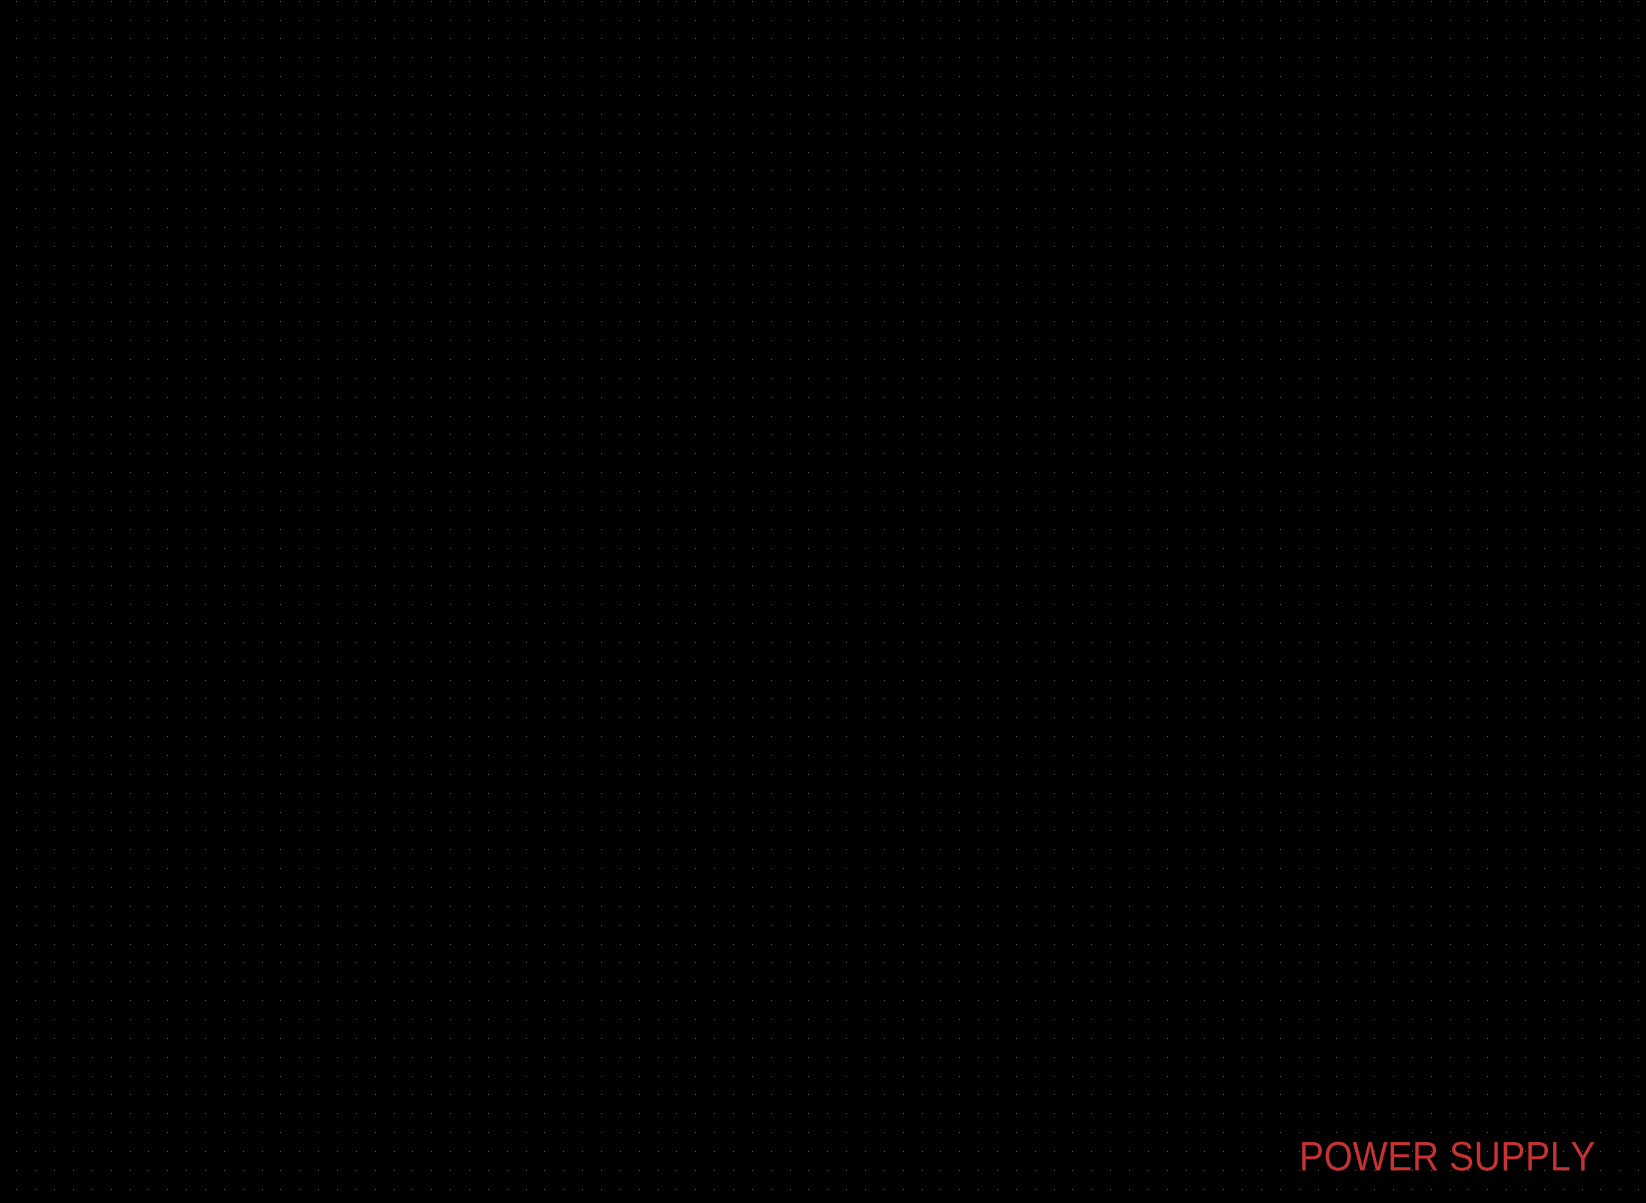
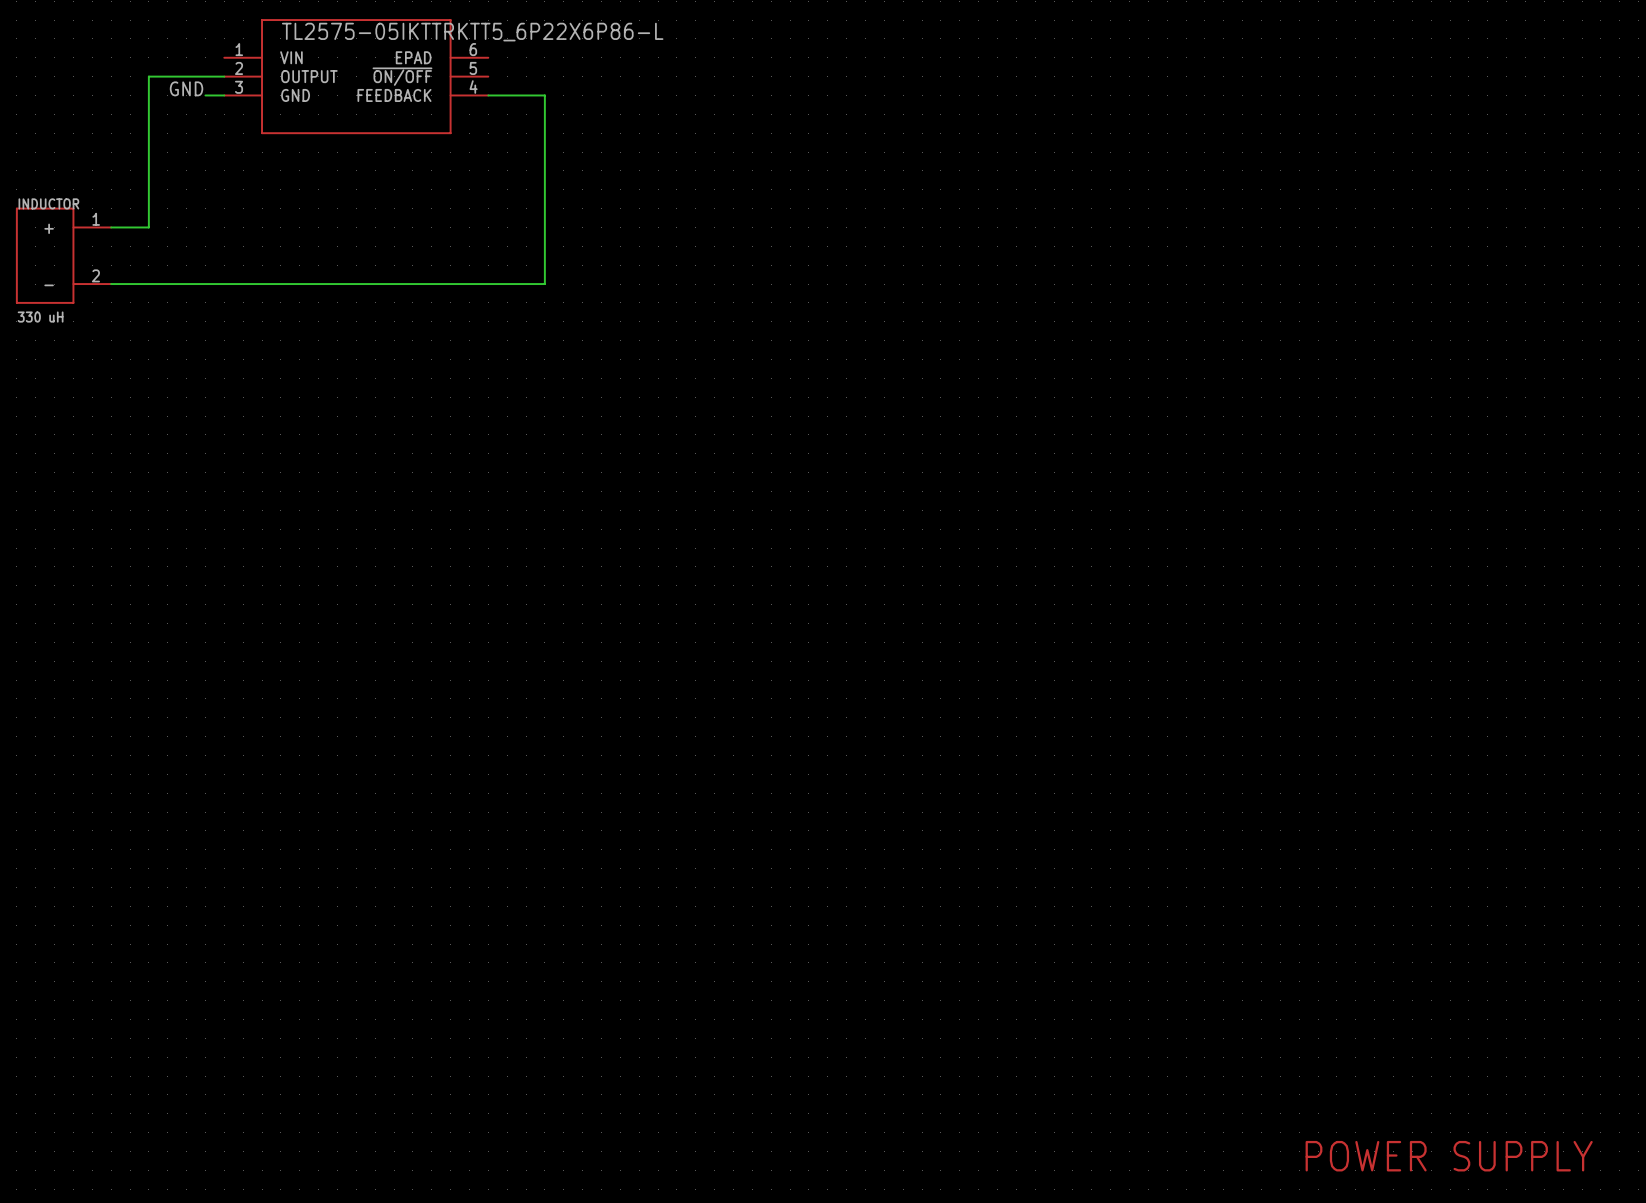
wire: none -> (224, 76) (148, 76) (148, 227) (111, 227)
part: none -> TL2575-05IKTTRKTT5_6P22X6P86-L (356, 76)
label: none -> GND (186, 88)
wire: none -> (205, 95) (224, 95)
wire: none -> (488, 95) (544, 95) (544, 284) (111, 284)
INDUCTOR: none -> 330 uH (63, 255)

